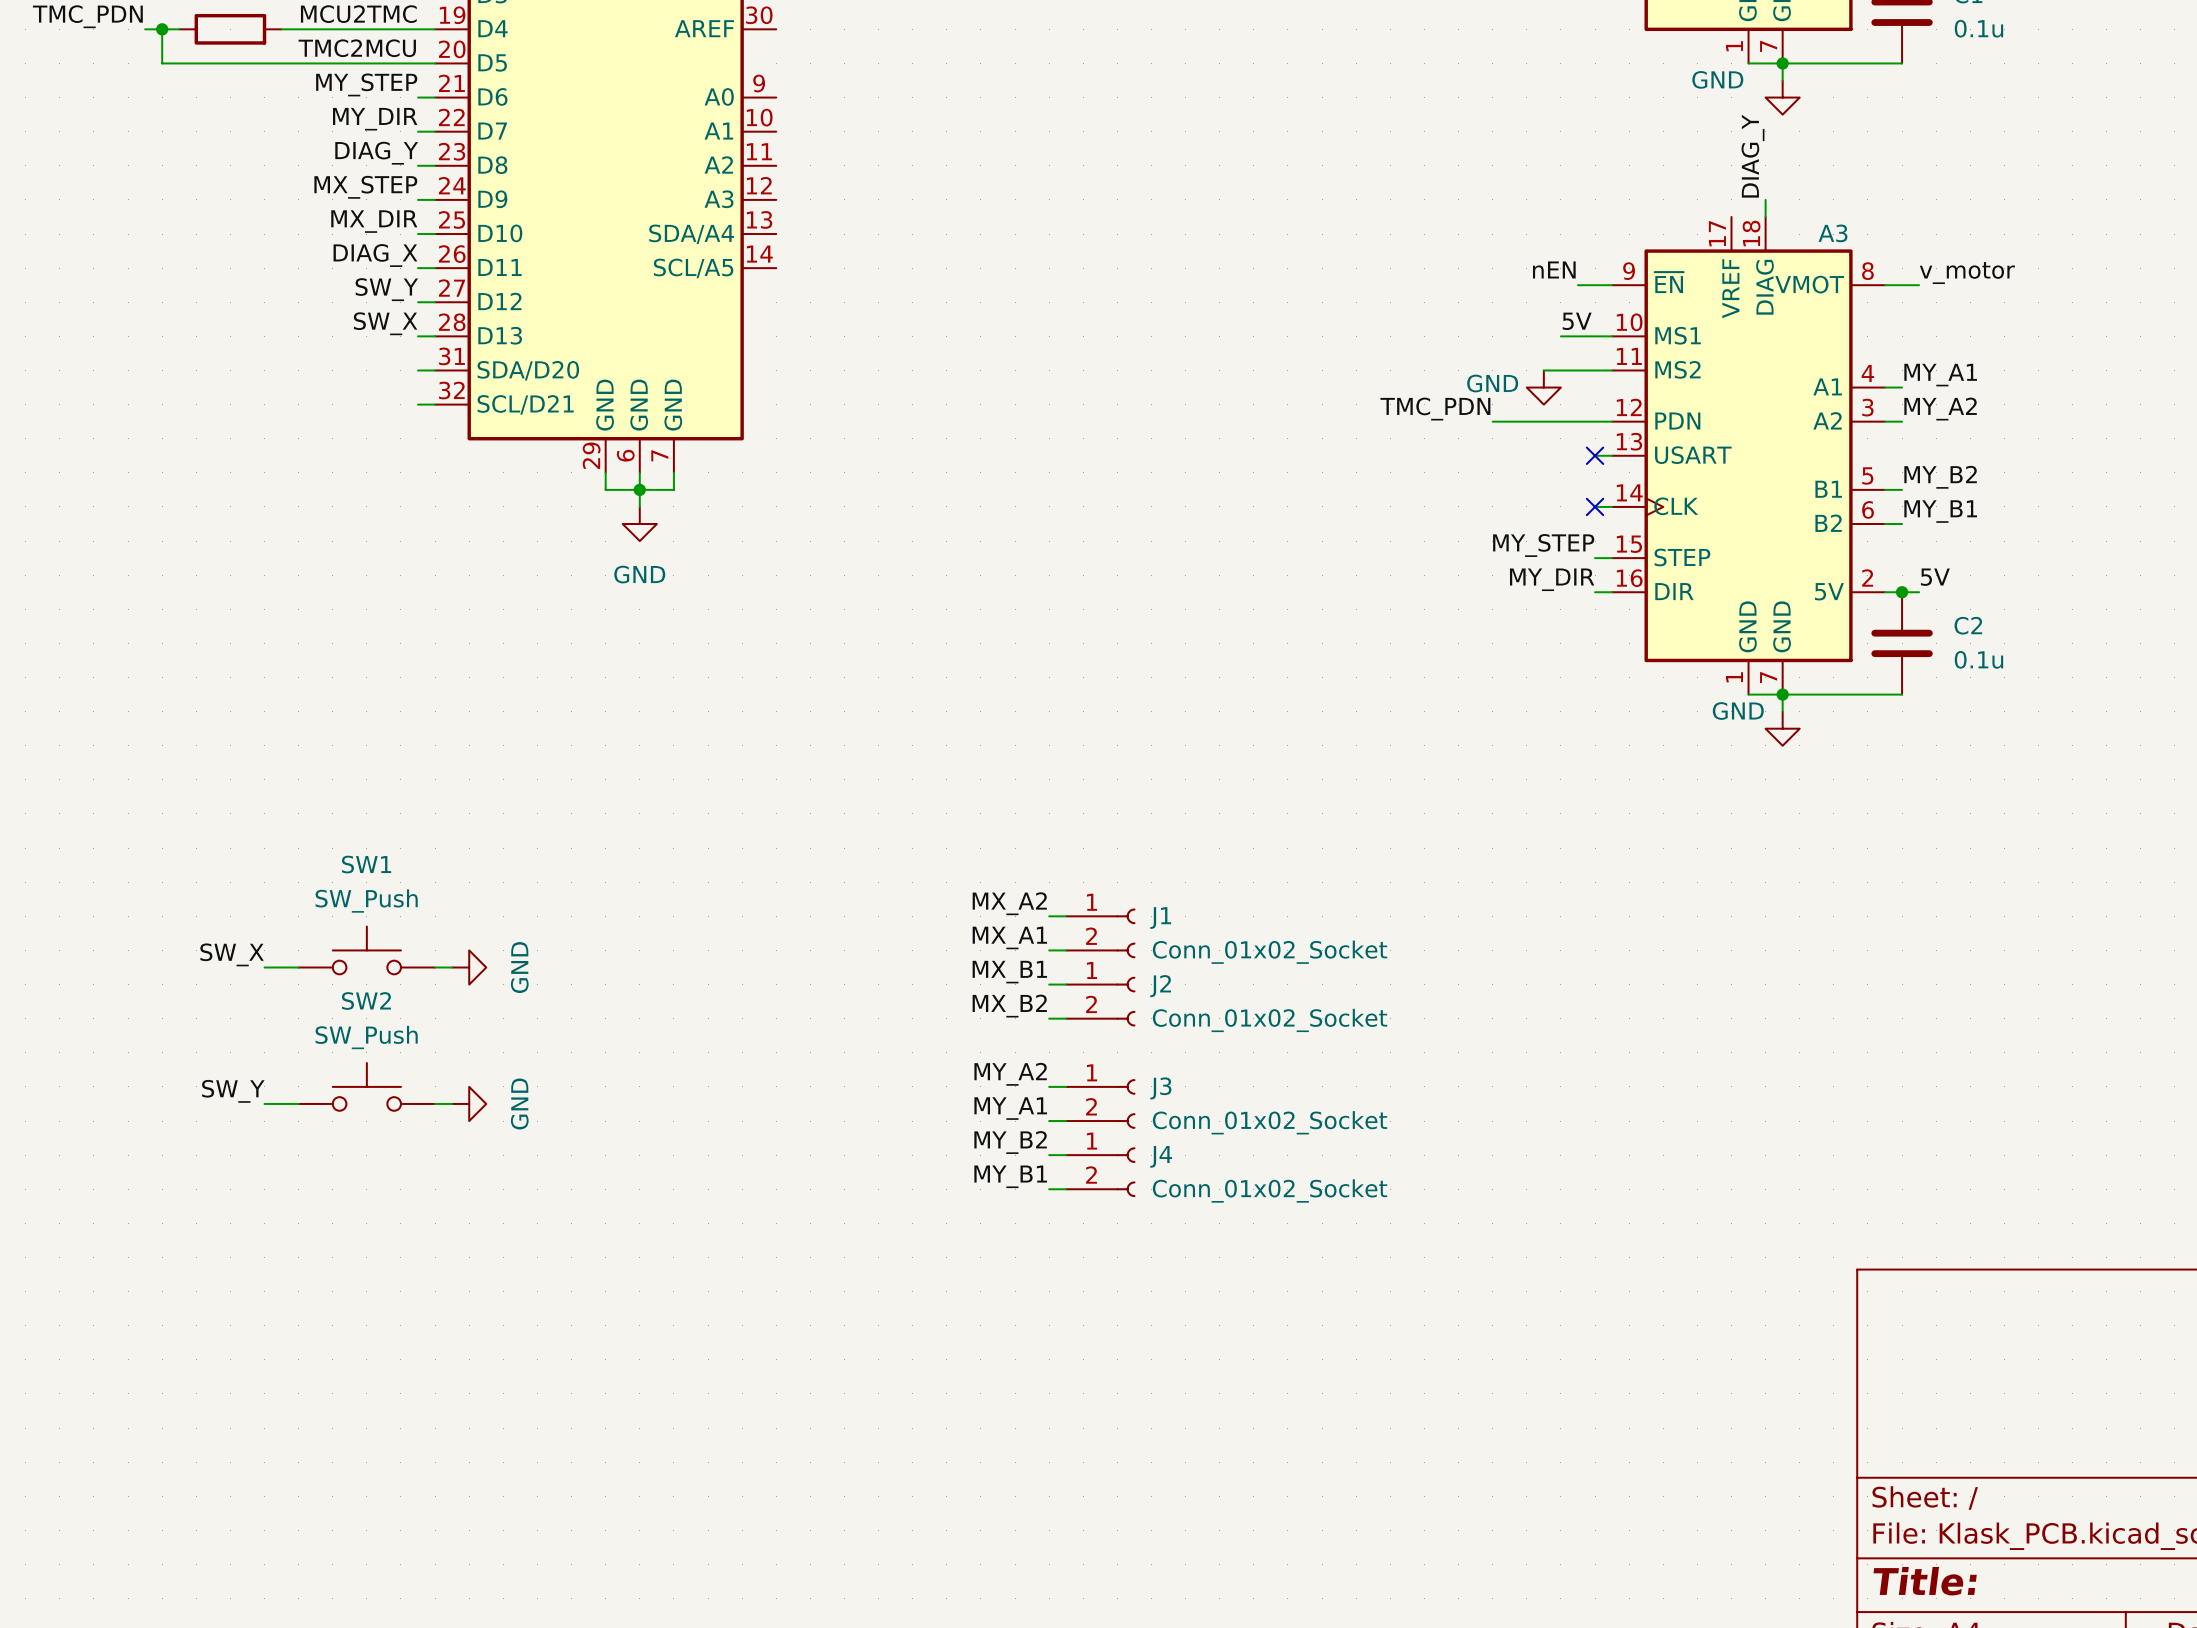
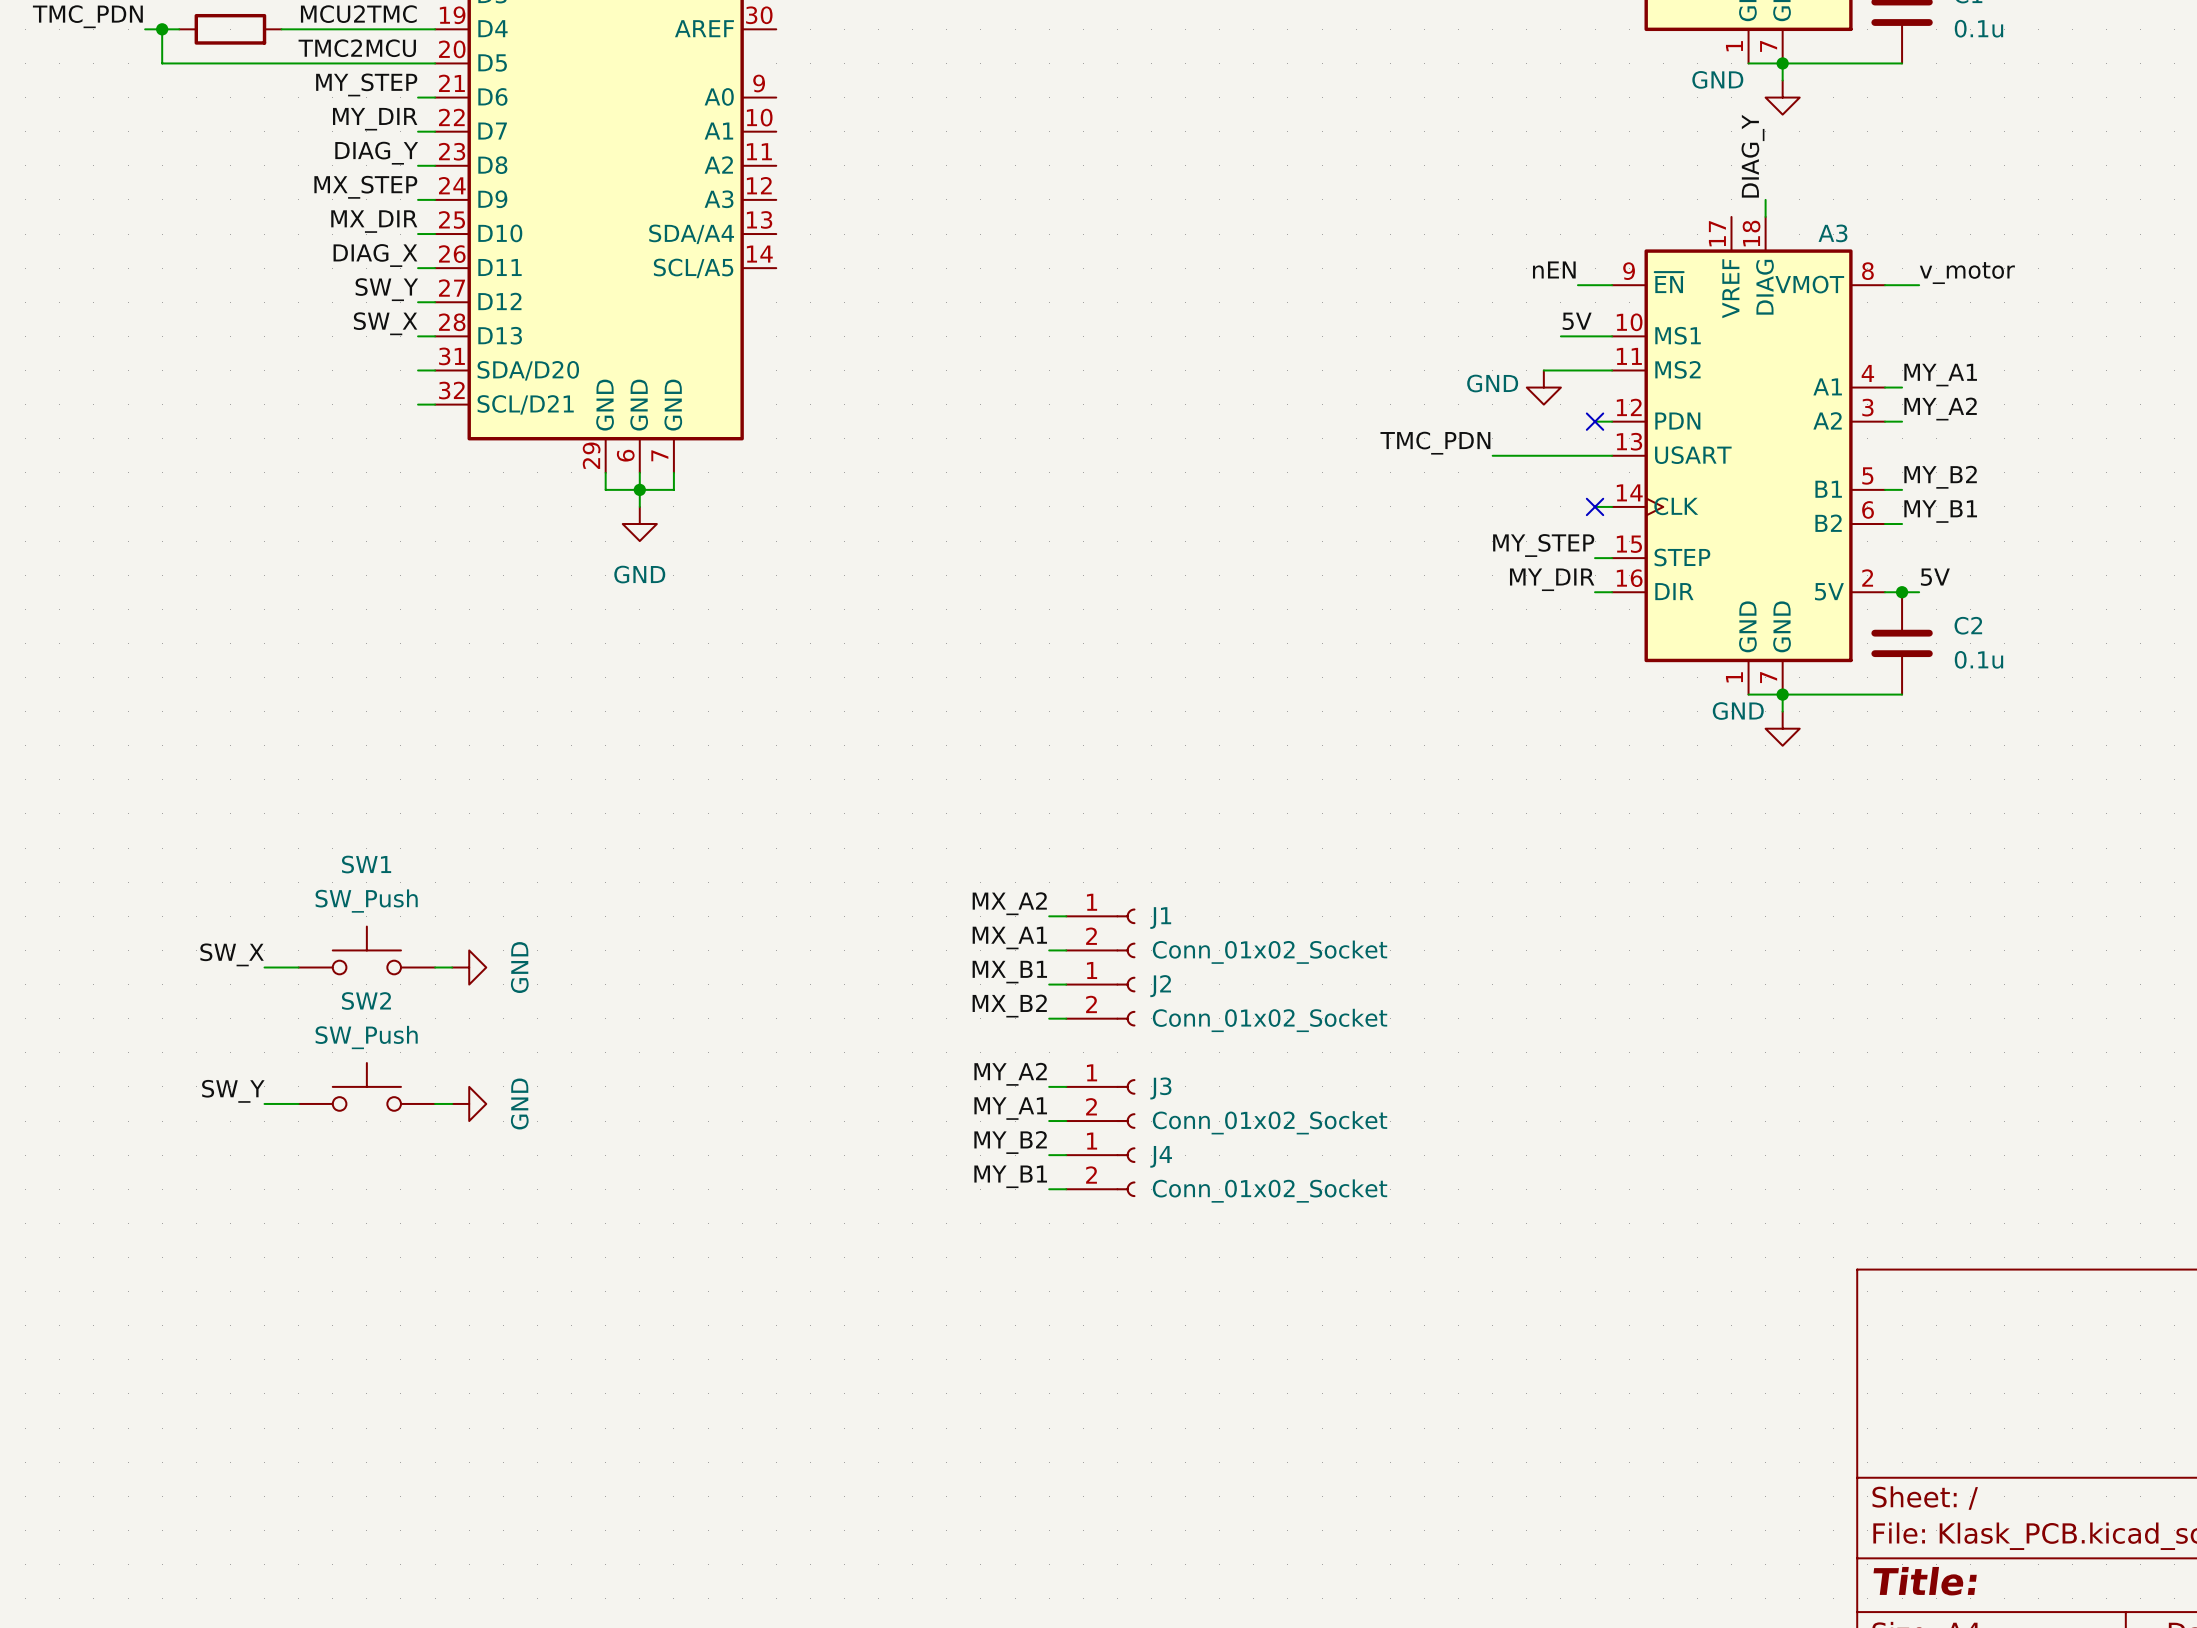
label position: TMC_PDN (1435, 409) -> TMC_PDN (1435, 443)
wire: (1492, 421) (1595, 421) -> (1492, 455) (1595, 455)
no-connect mark position: (1595, 455) -> (1595, 421)

